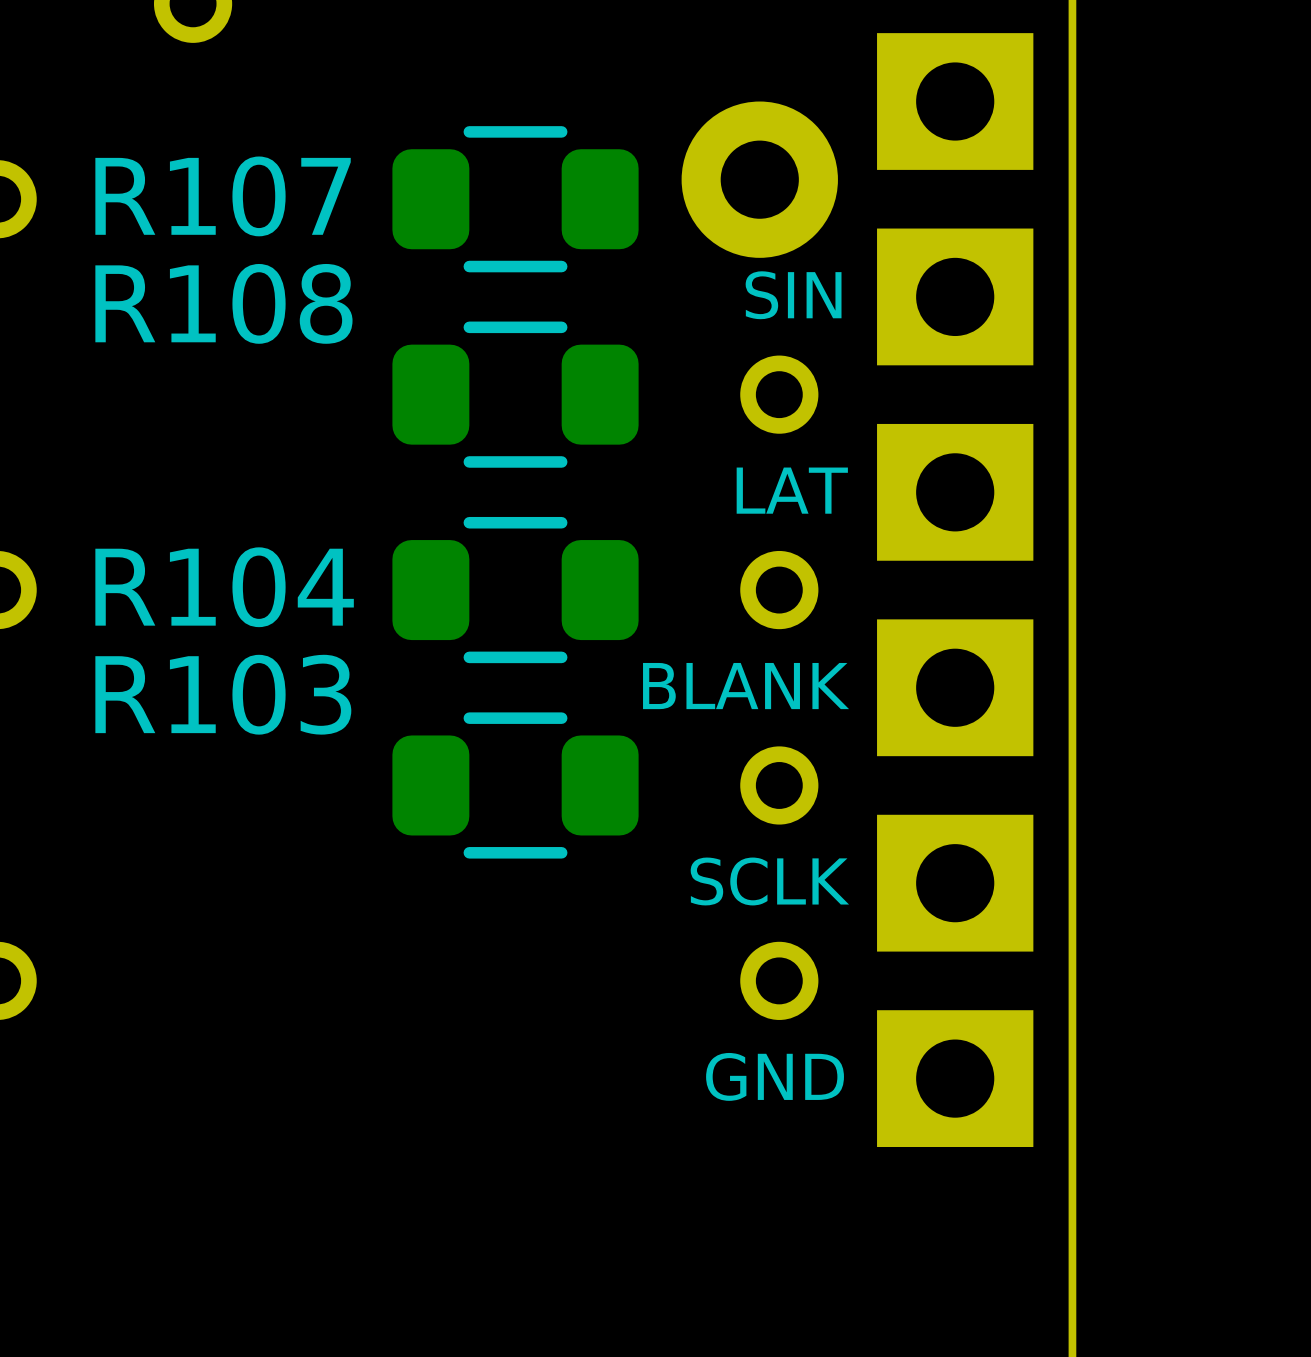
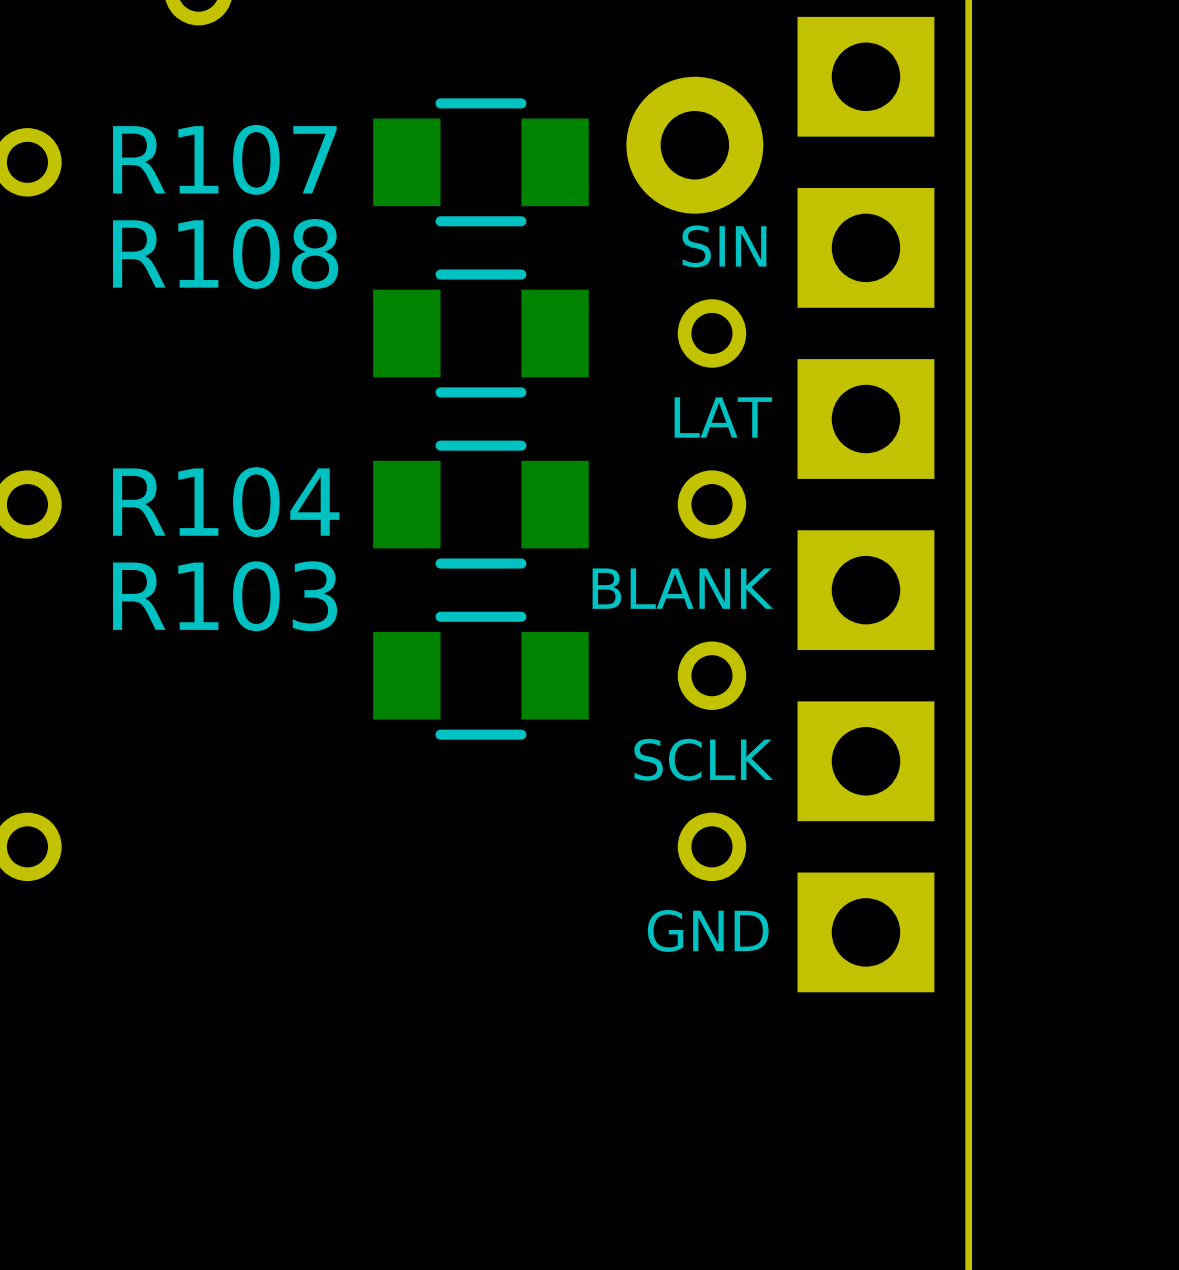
R107 footprint: [392, 126, 639, 273] -> [373, 98, 589, 227]
R108 footprint: [392, 321, 639, 468] -> [373, 269, 589, 398]
R104 footprint: [392, 516, 639, 664] -> [373, 440, 589, 569]
R103 footprint: [392, 712, 639, 859] -> [373, 611, 589, 740]

